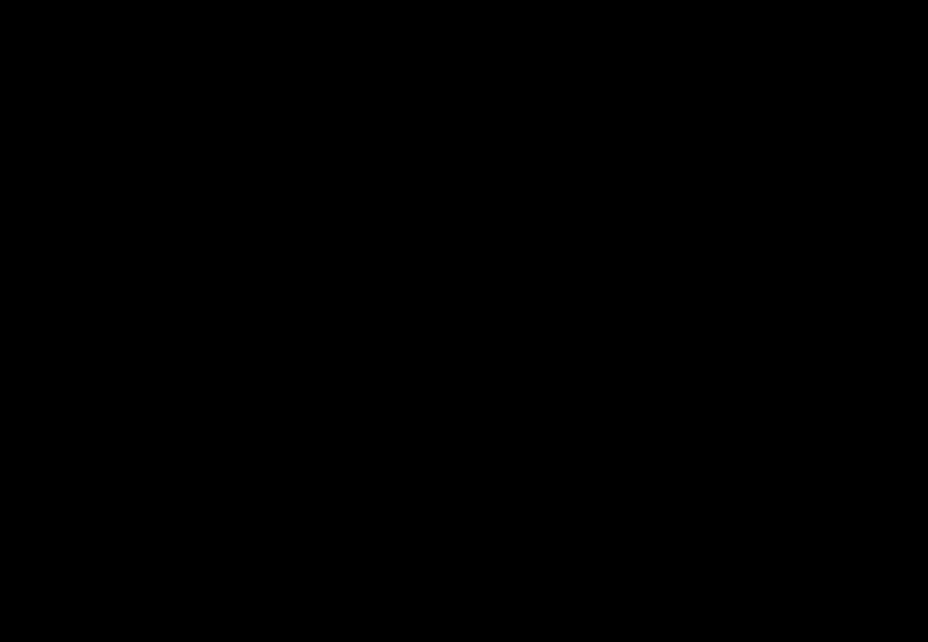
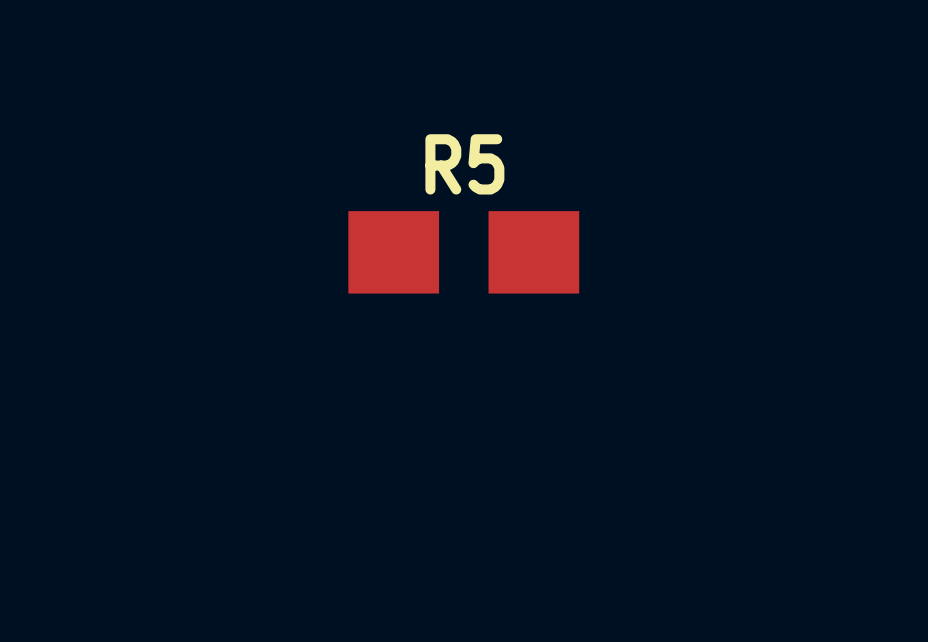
R5: none -> (463, 252)

